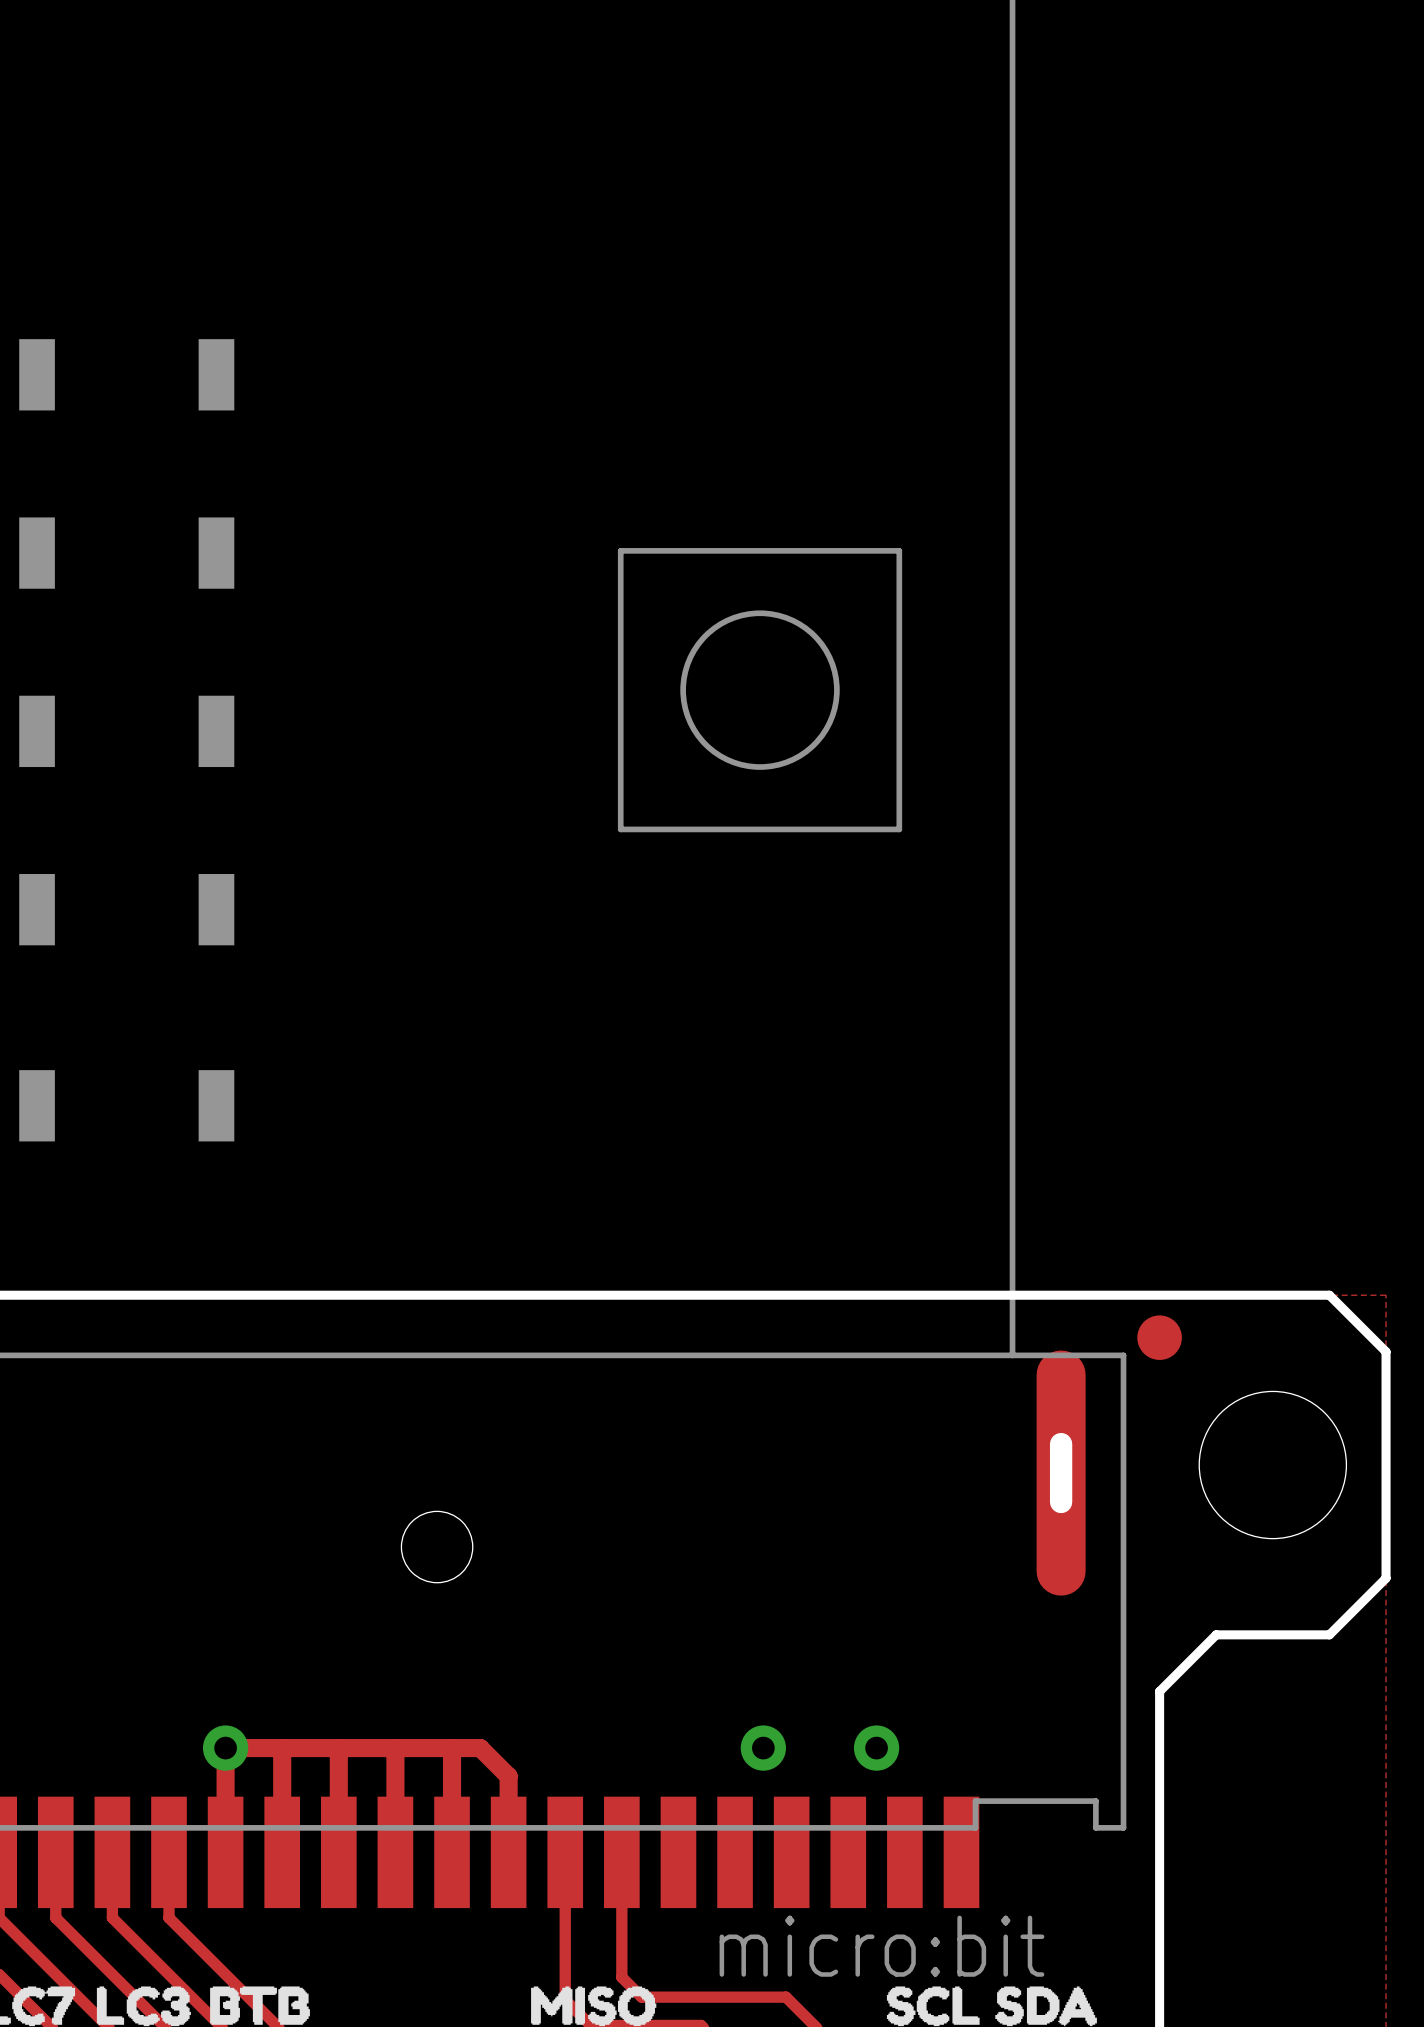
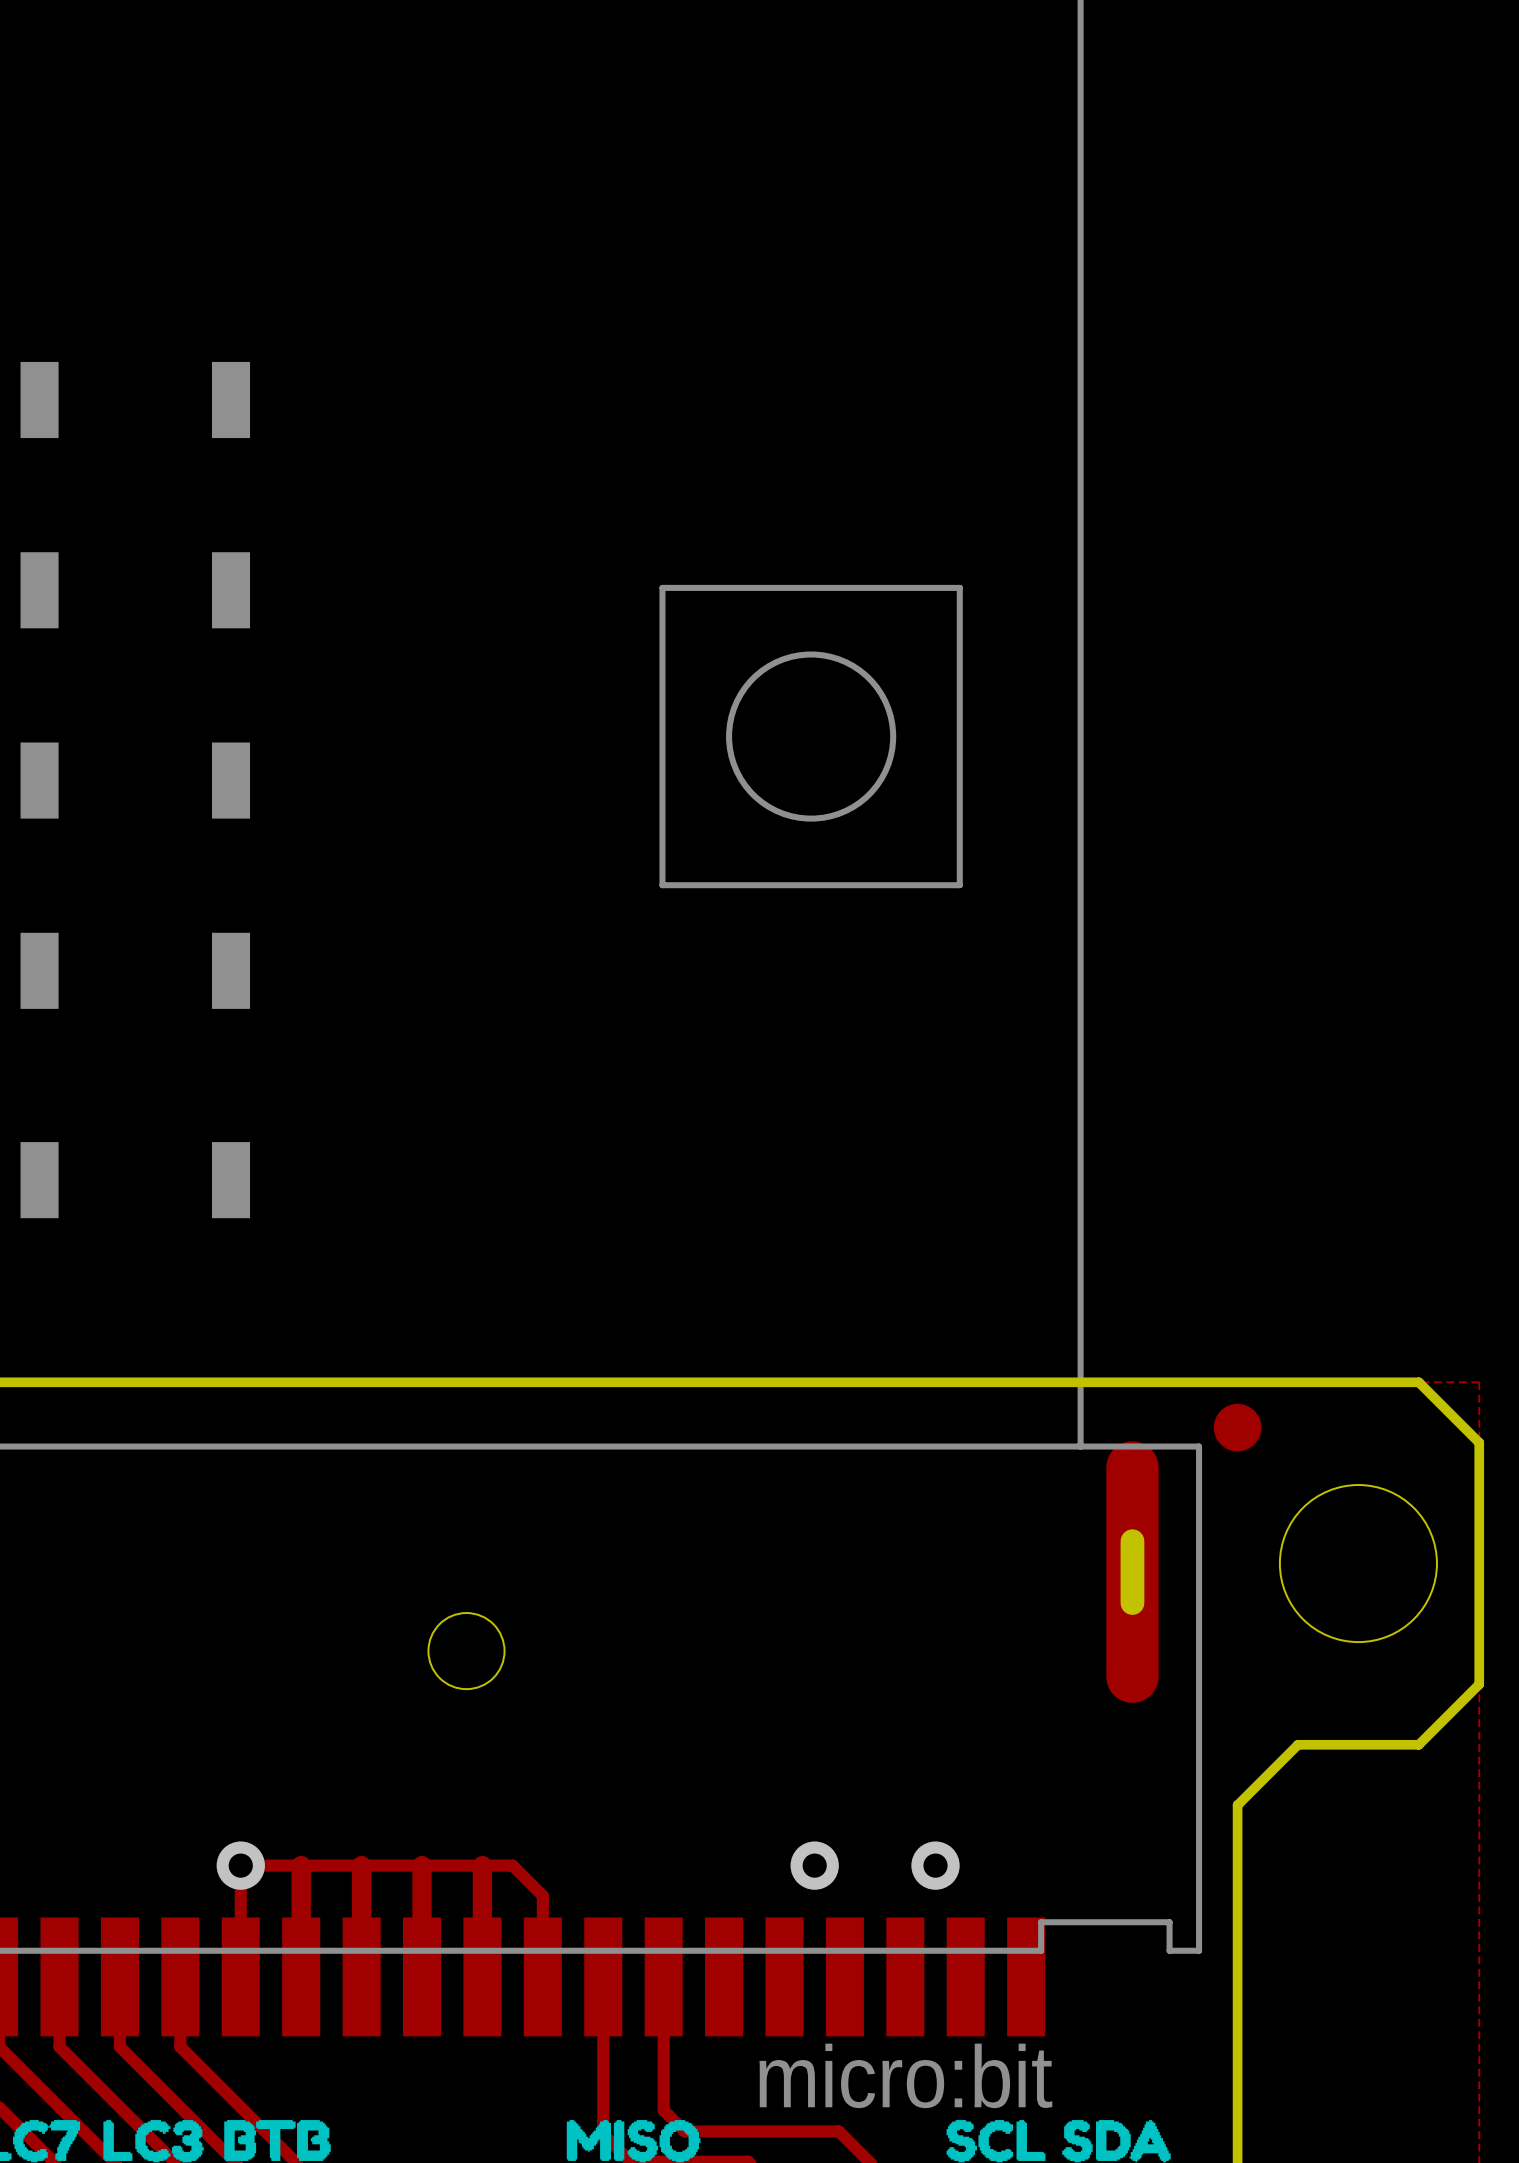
track width: thick (225, 1852) (225, 1748) (480, 1748) (508, 1776) (508, 1852) -> thin (240, 1976) (240, 1865) (512, 1865) (542, 1895) (542, 1976)

